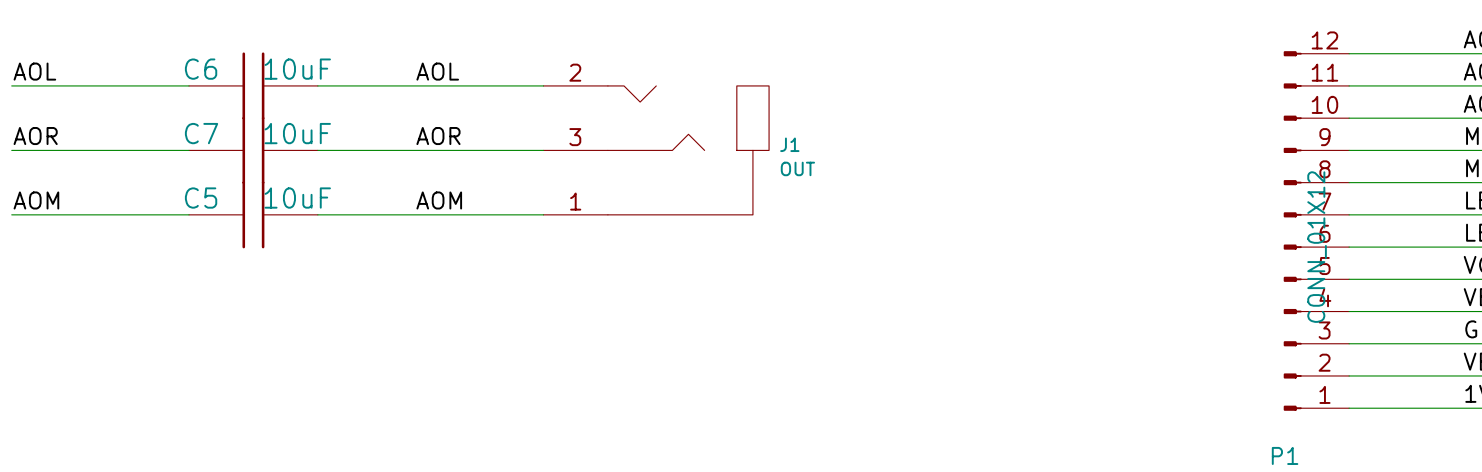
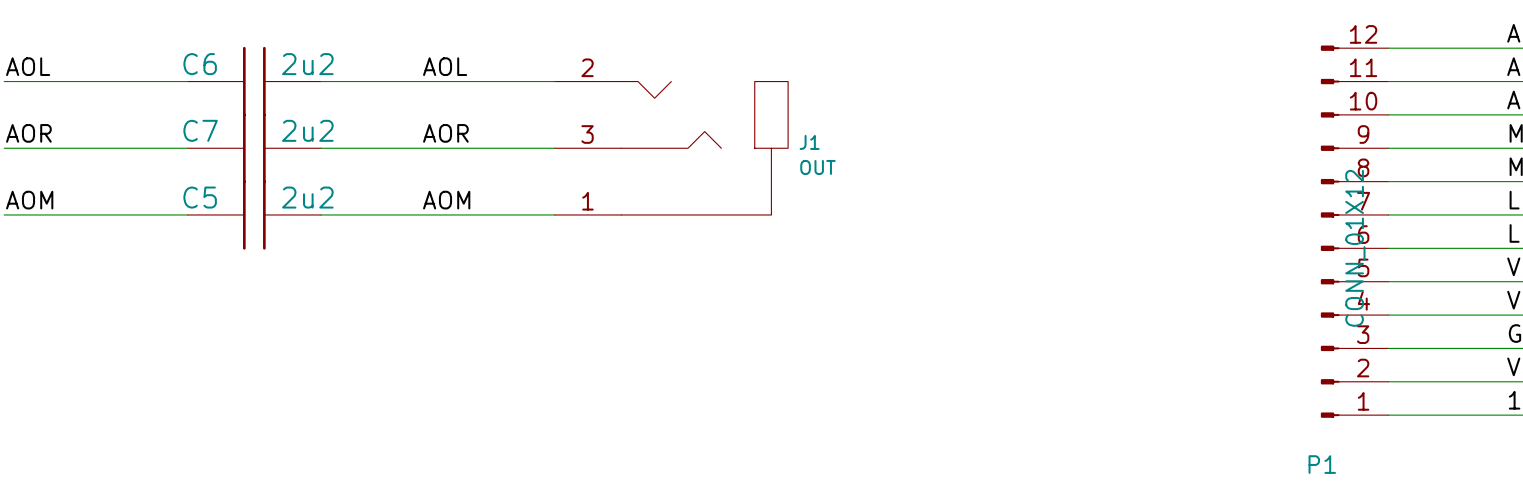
C6 value: 10uF (297, 69) -> 2u2 (307, 64)
C7 value: 10uF (297, 133) -> 2u2 (307, 130)
C5 value: 10uF (297, 198) -> 2u2 (307, 197)

